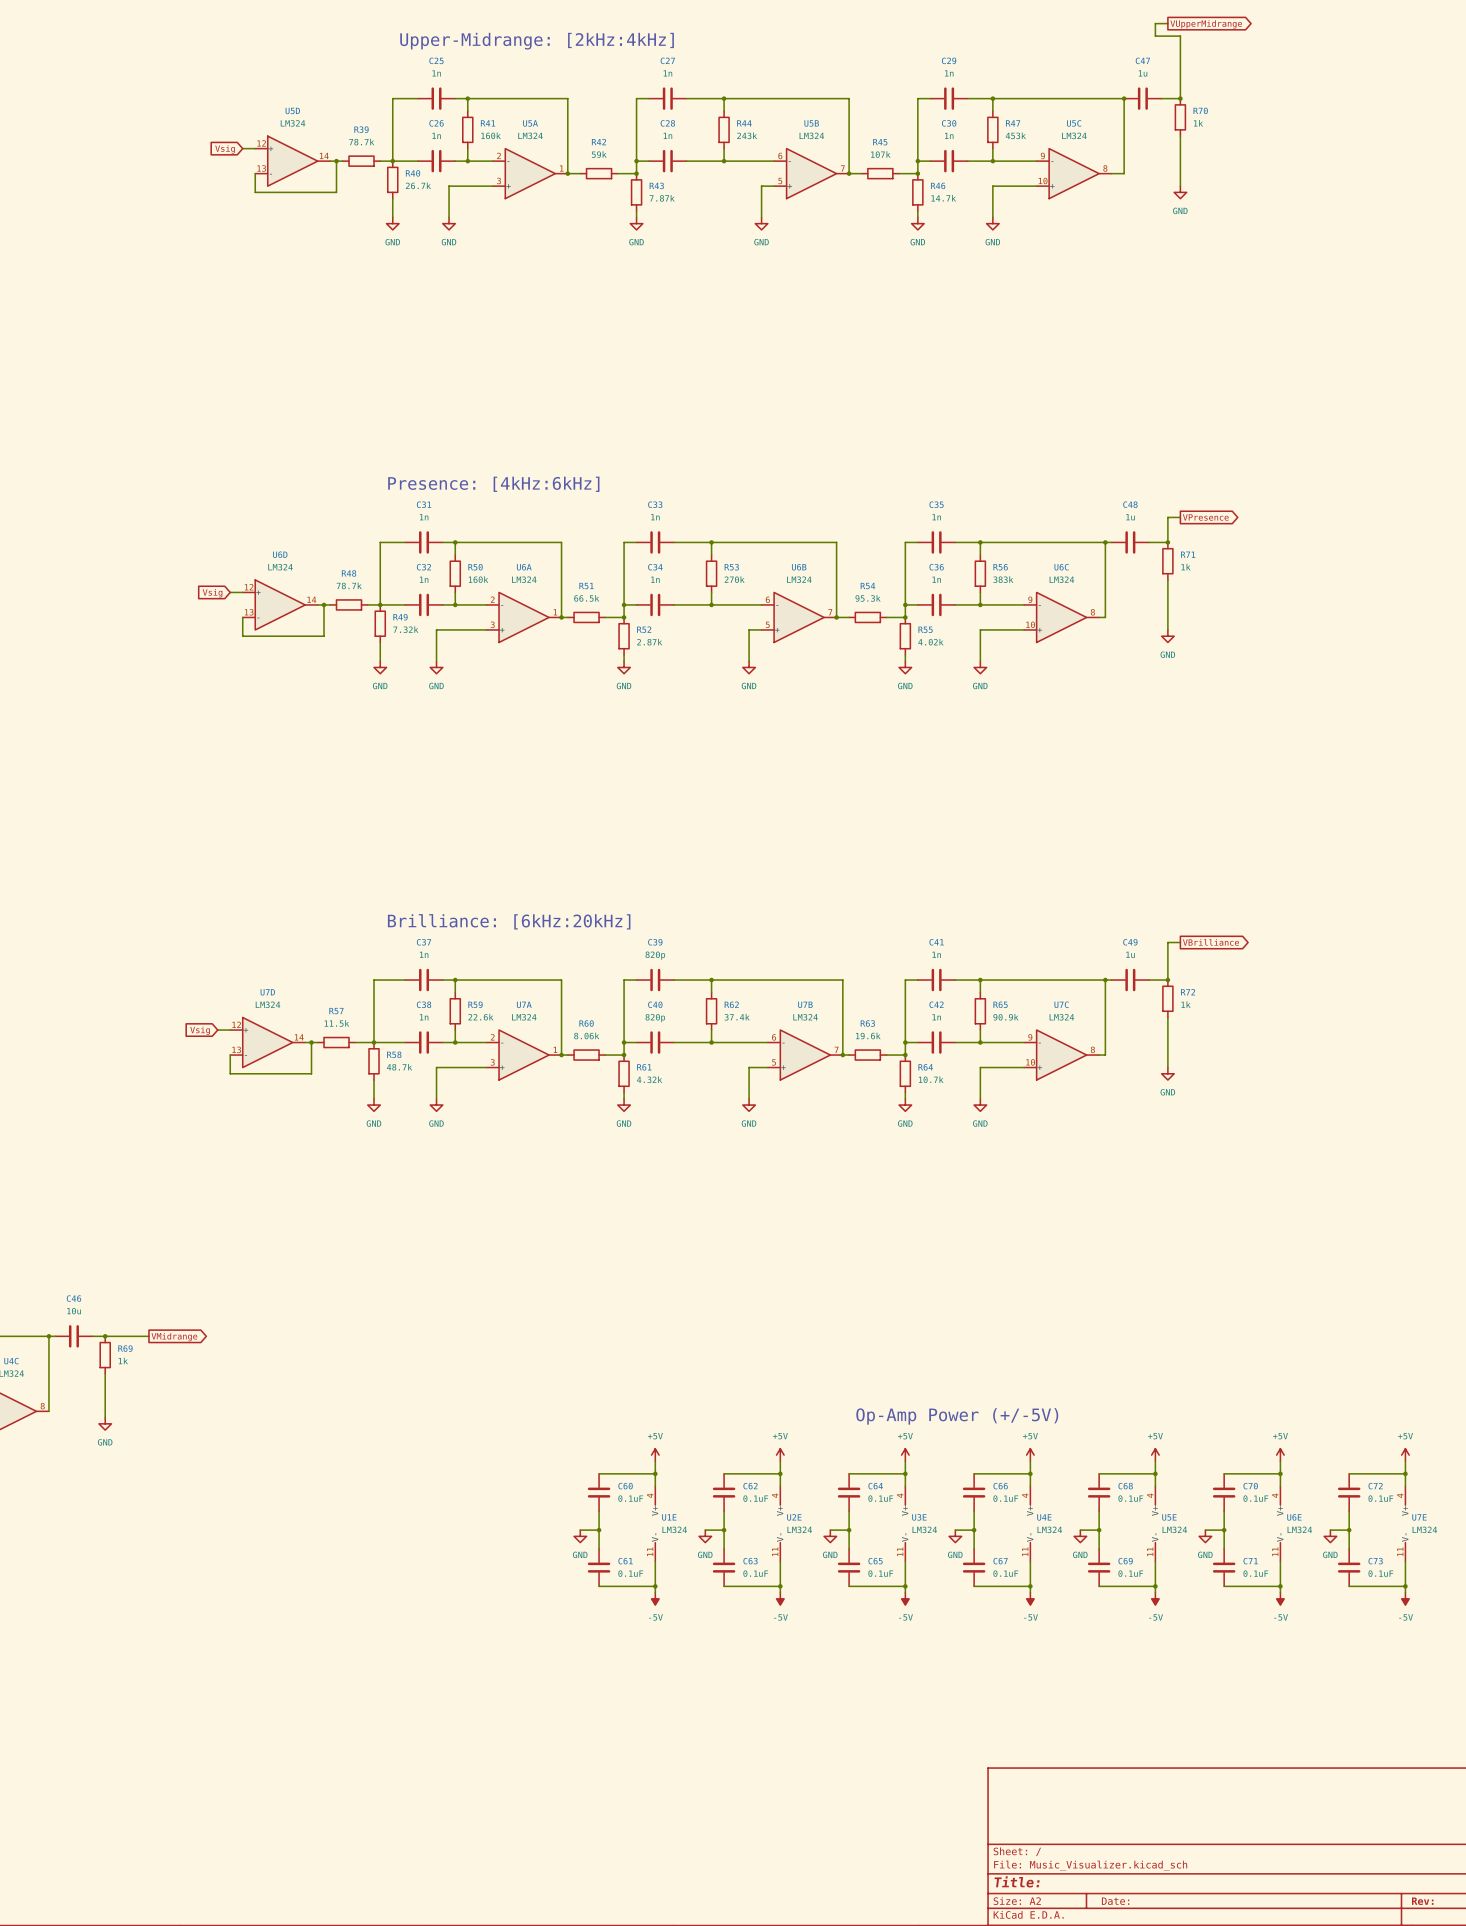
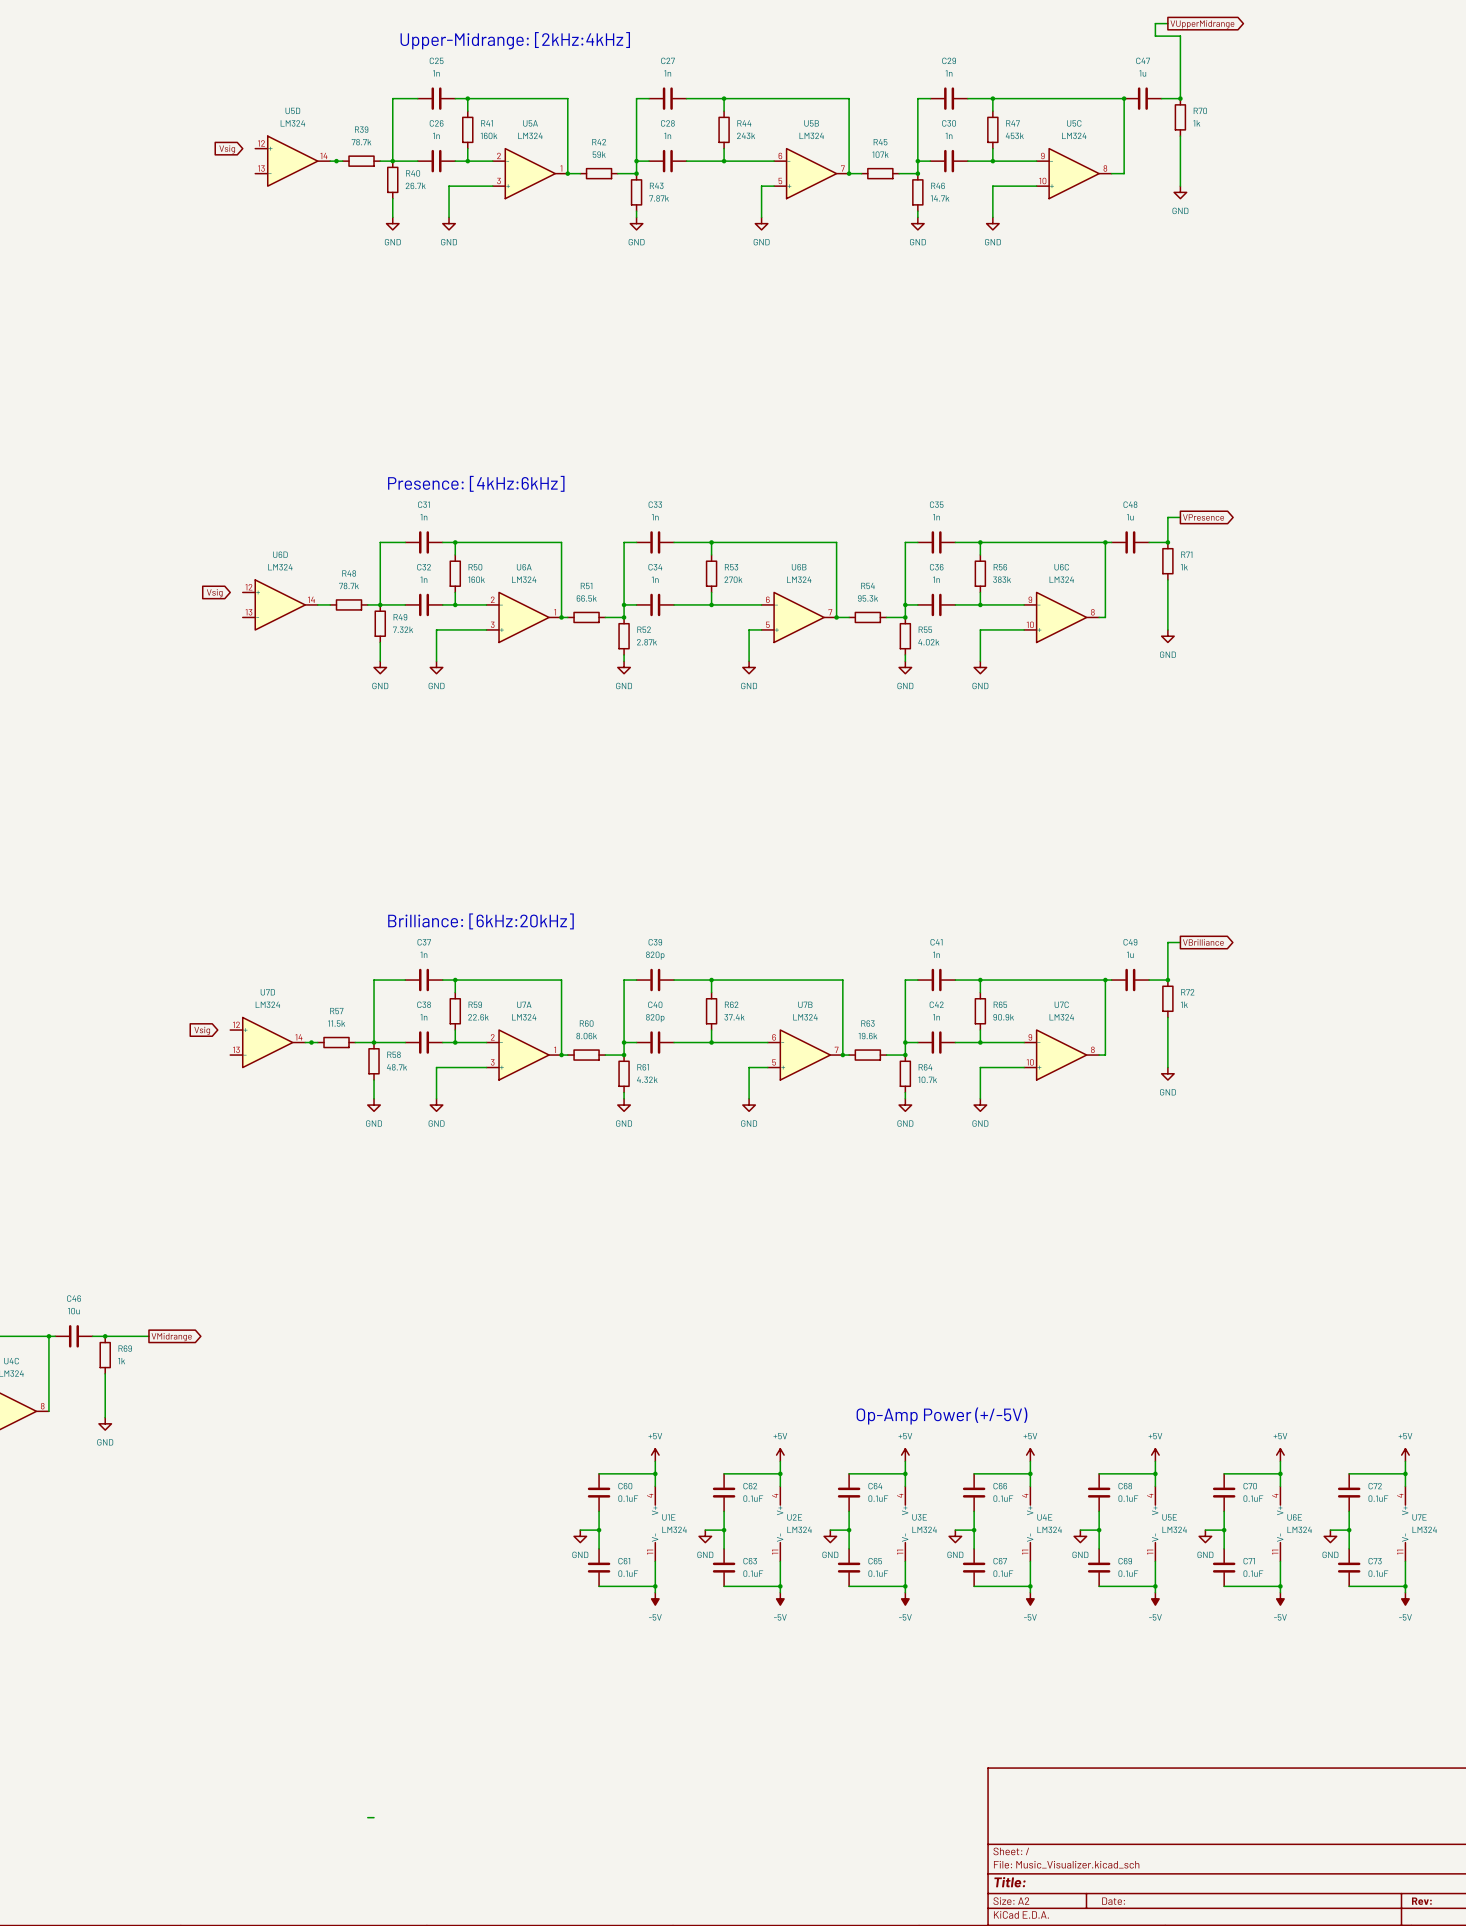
wire: (242, 148) (255, 148) -> none
wire: (336, 161) (336, 192) (255, 192) (255, 173) -> none
wire: (230, 592) (242, 592) -> none
wire: (324, 604) (324, 636) (242, 636) (242, 617) -> none
junction: (324, 604) -> none
wire: (217, 1030) (230, 1030) -> none
wire: (311, 1042) (311, 1073) (230, 1073) (230, 1055) -> none
wire: none -> (367, 1817) (374, 1817)

